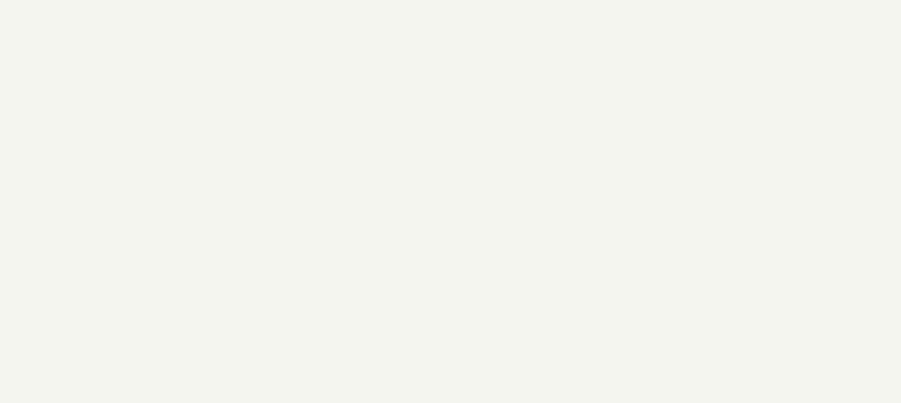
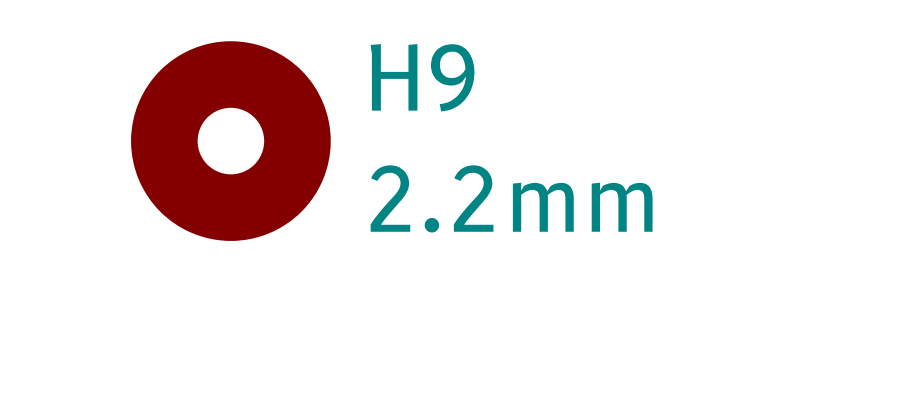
H9: none -> 2.2mm (230, 141)

